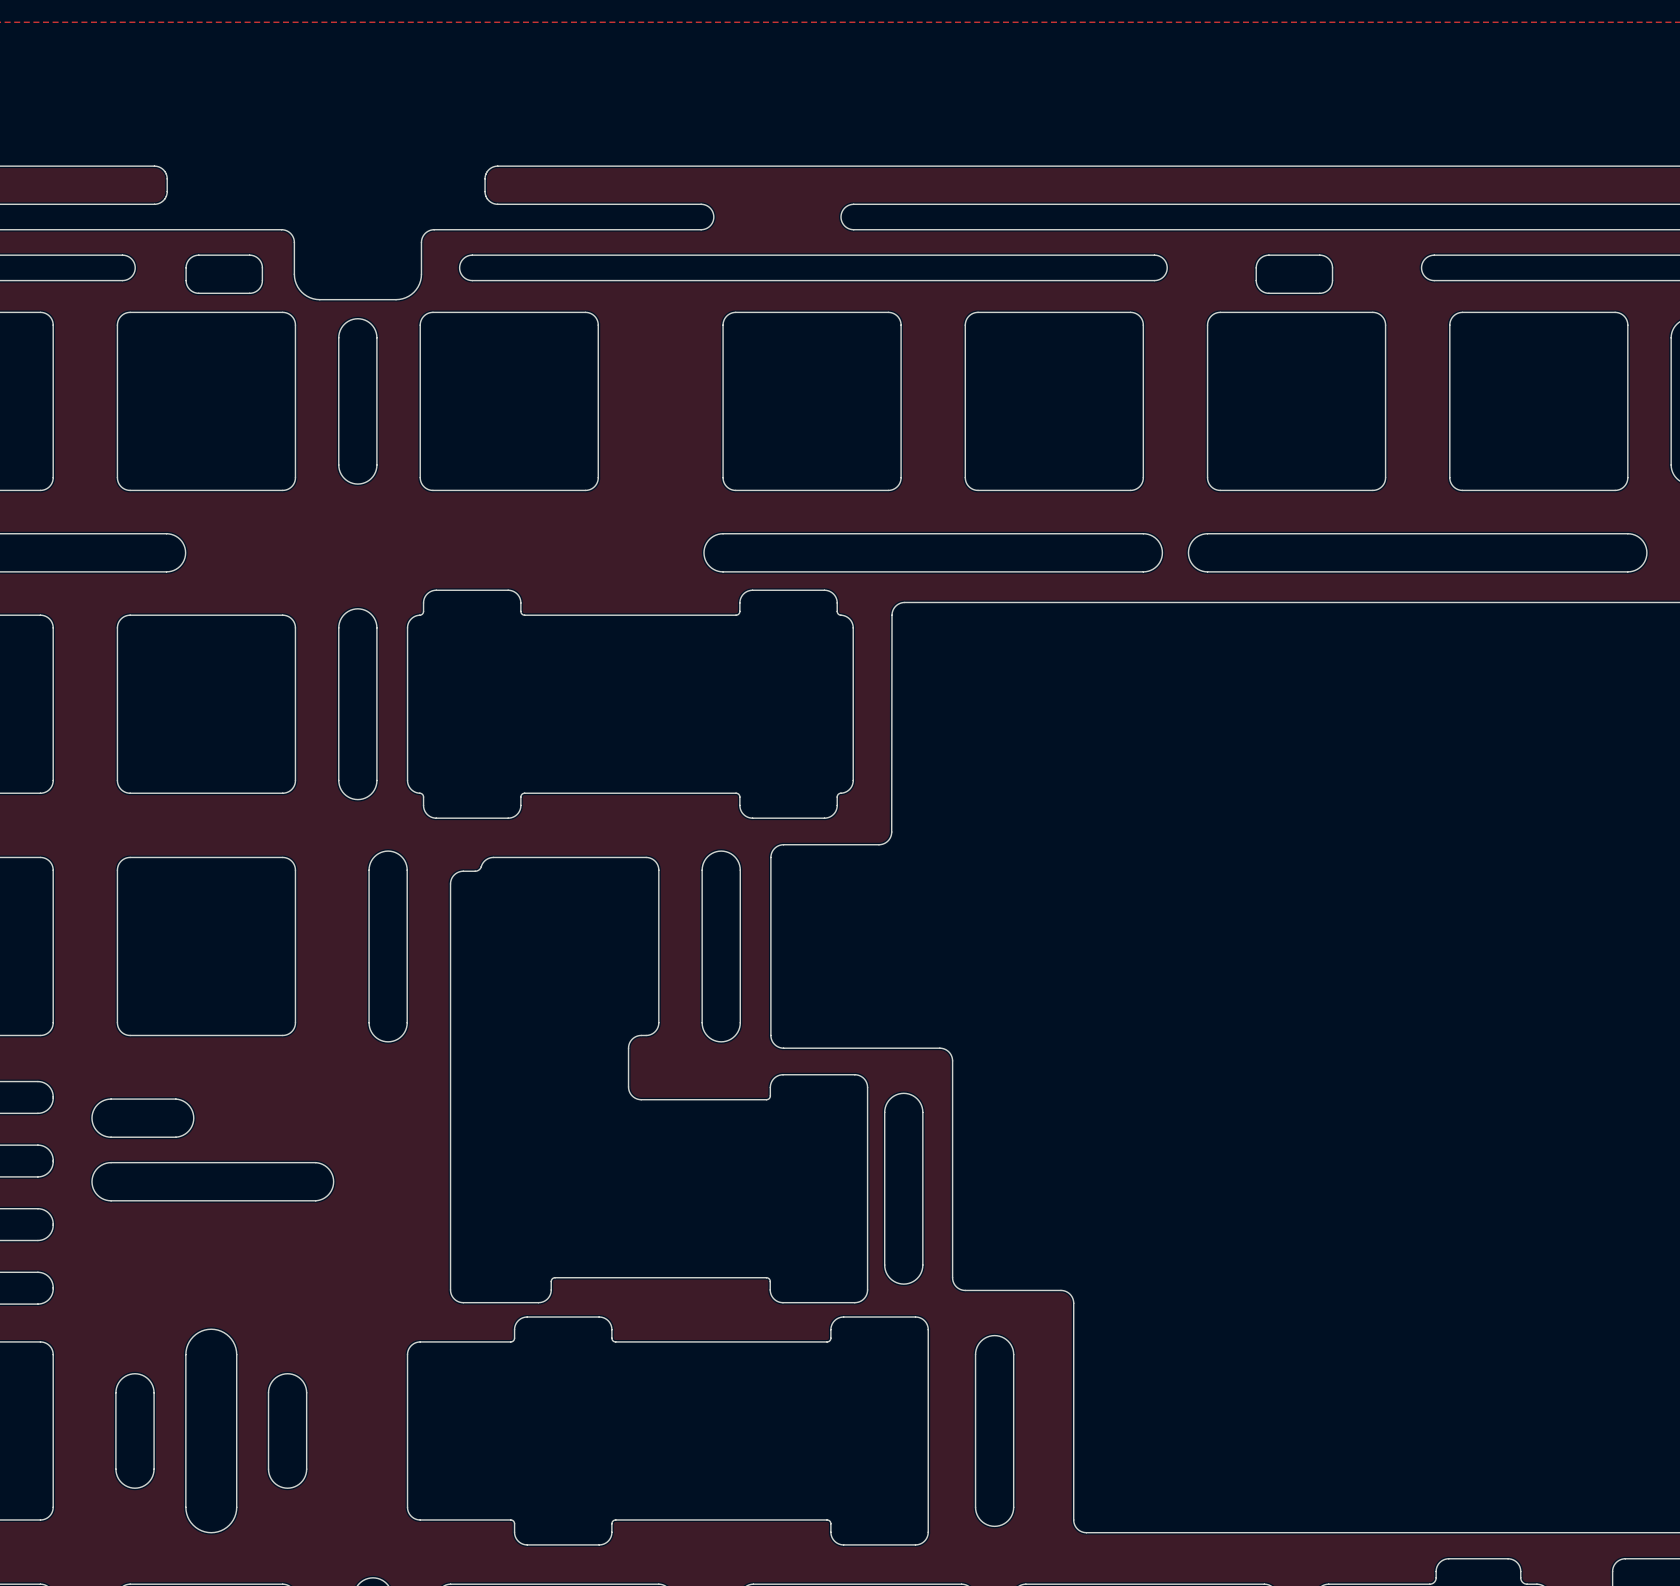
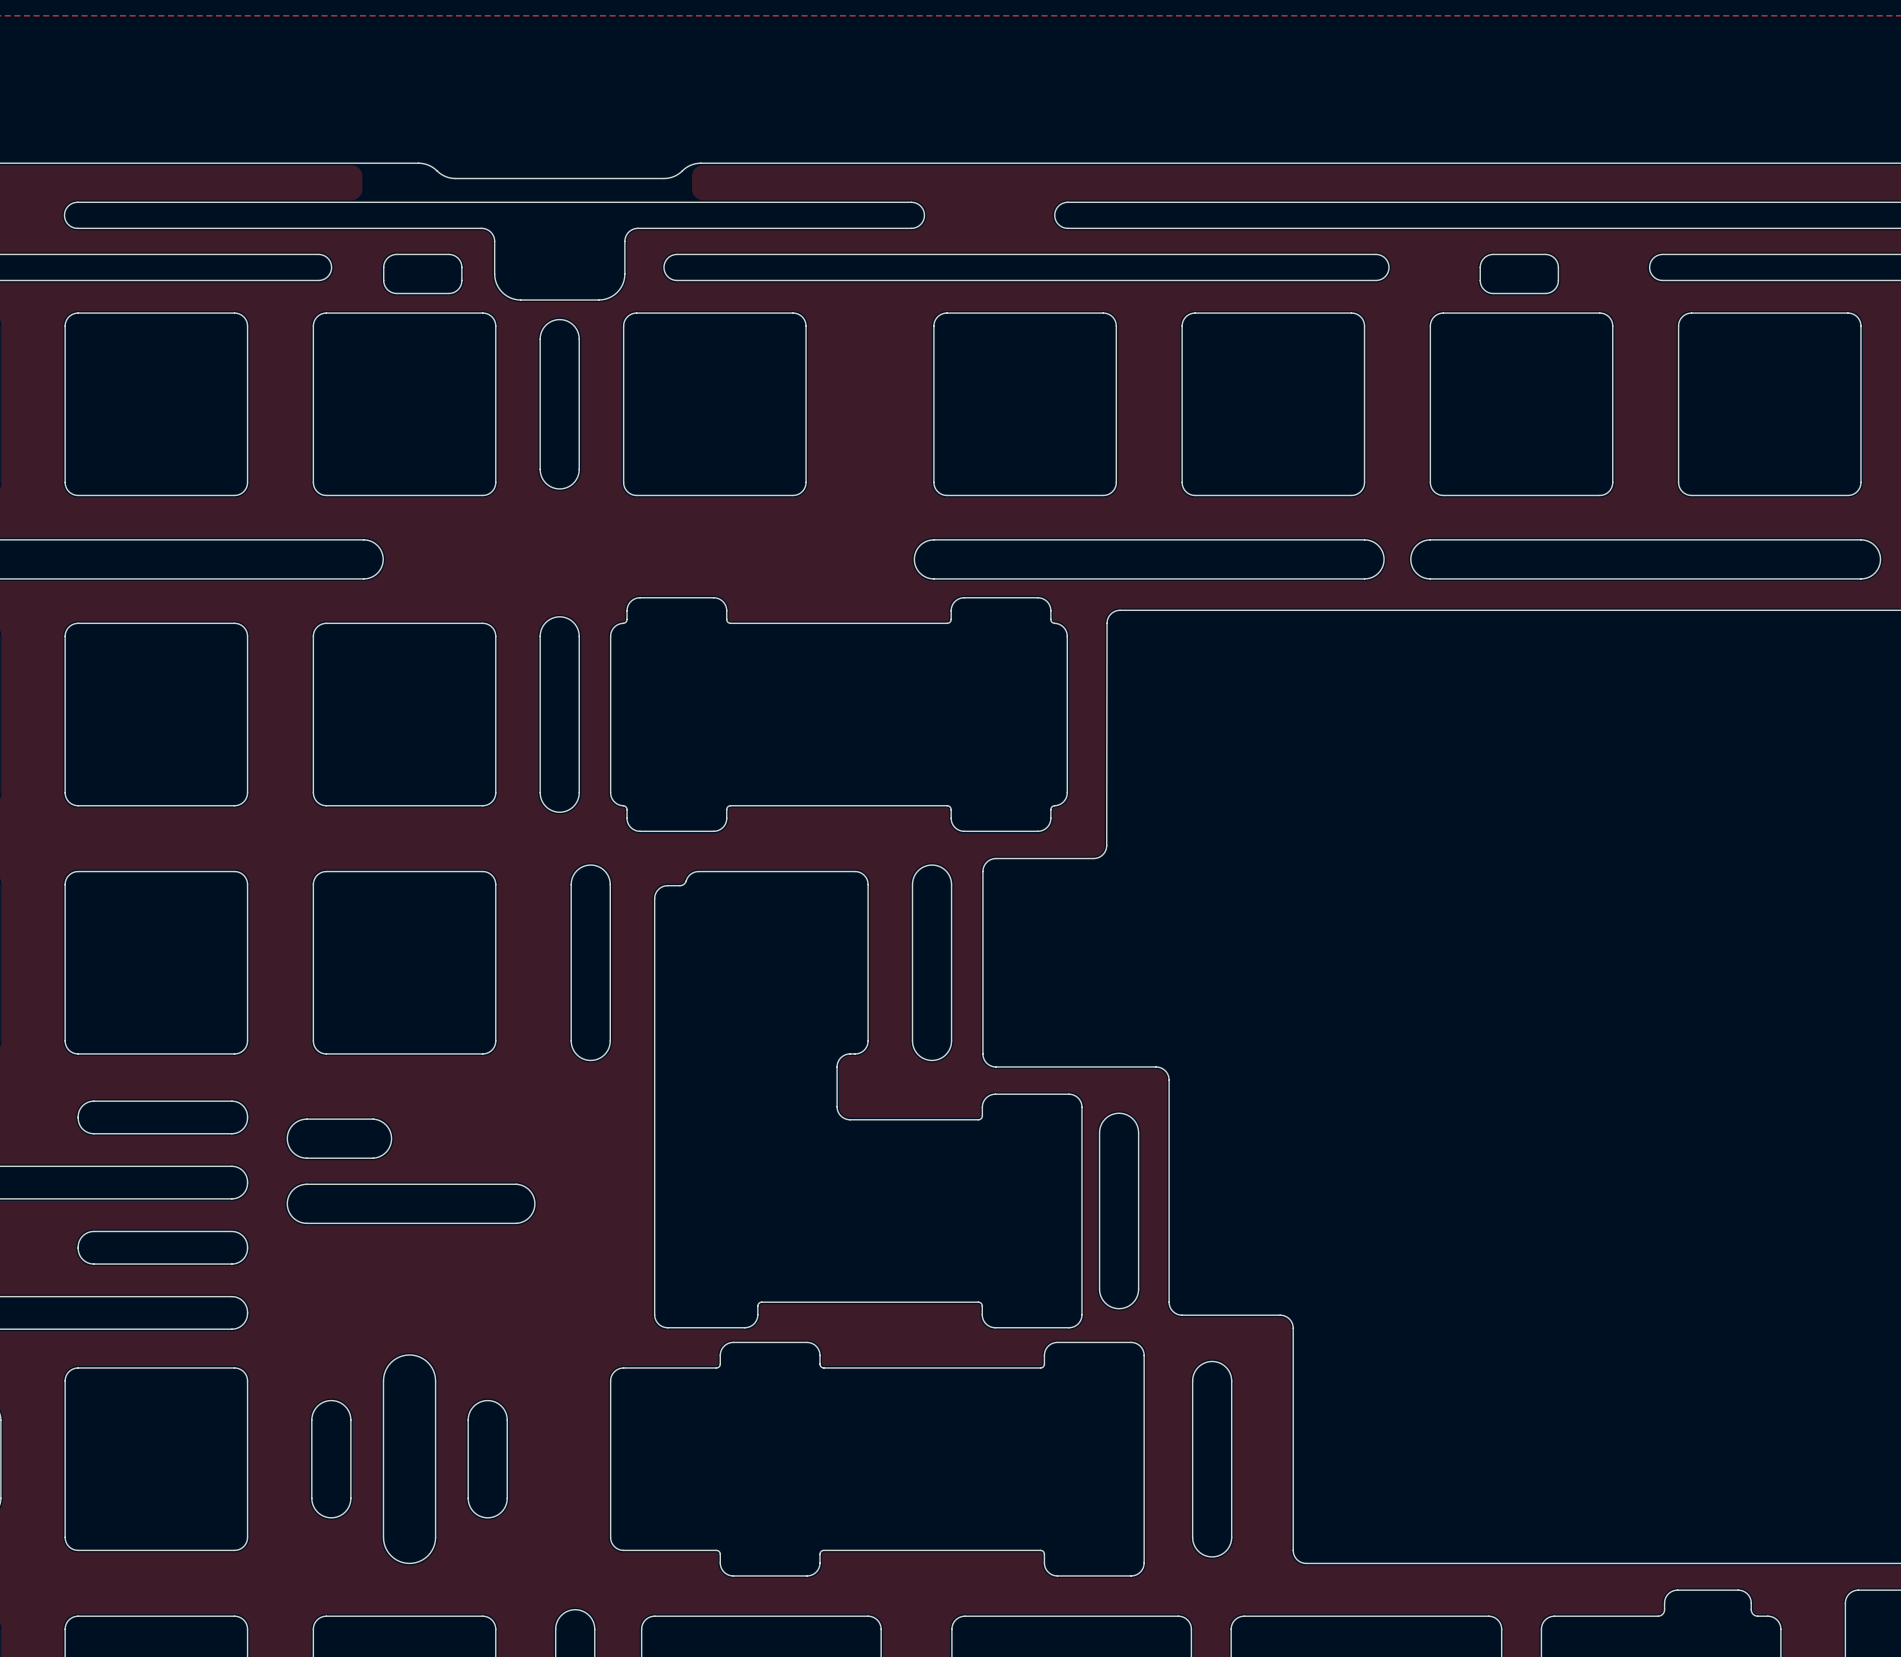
board edge: (154, 166) (163, 170) (167, 178) (165, 197) (161, 202) (154, 204) -> (351, 163) (421, 163) (430, 166) (445, 176) (455, 178) (663, 178) (676, 175) (690, 165) (703, 163)
board edge: (497, 166) (488, 170) (485, 178) (486, 197) (490, 202) (497, 204) -> (351, 202) (703, 202)

